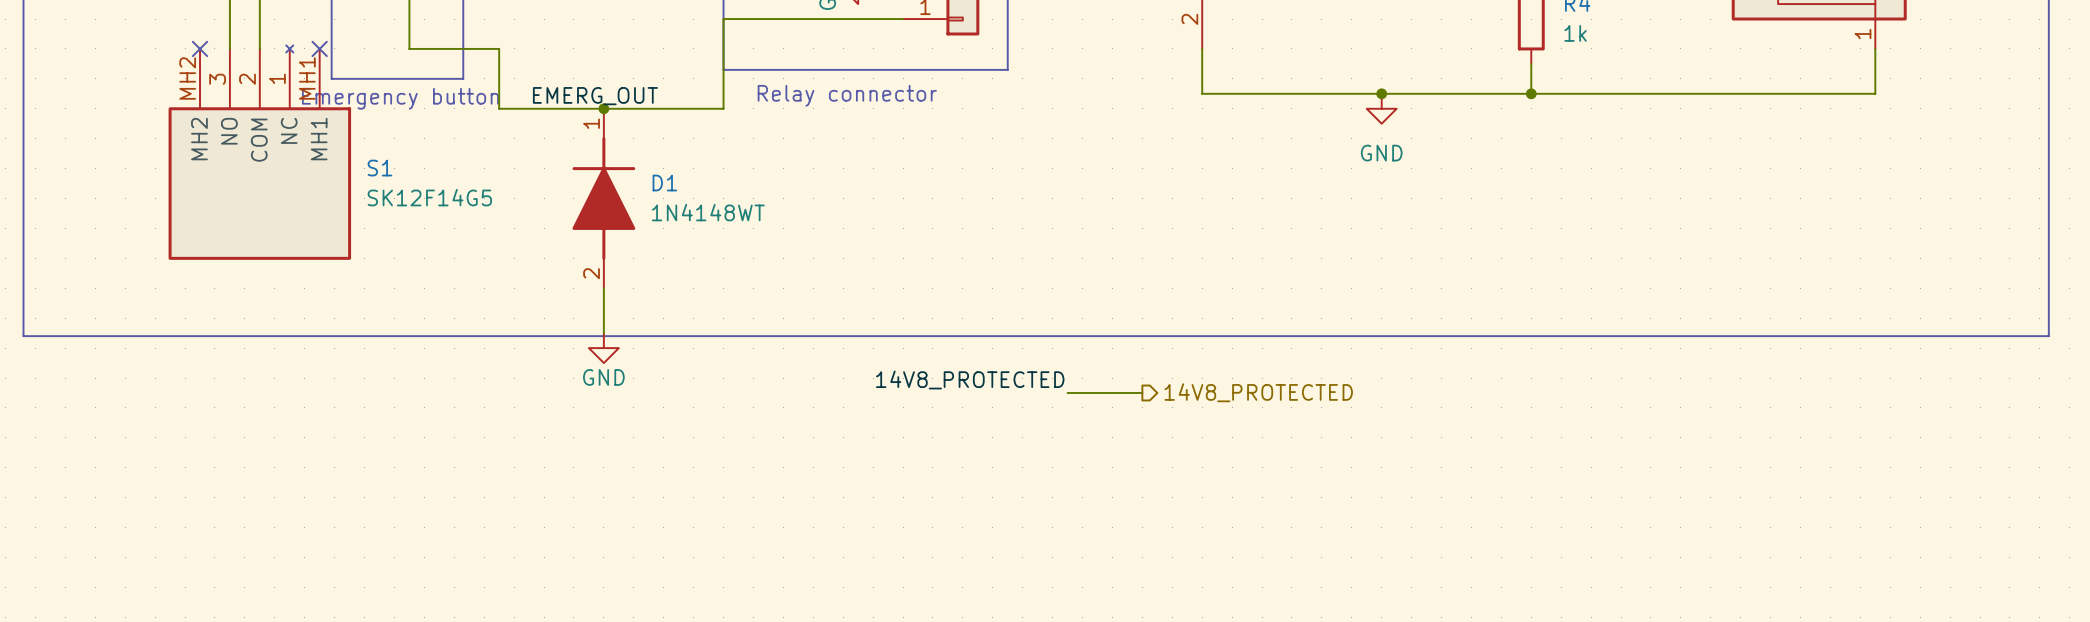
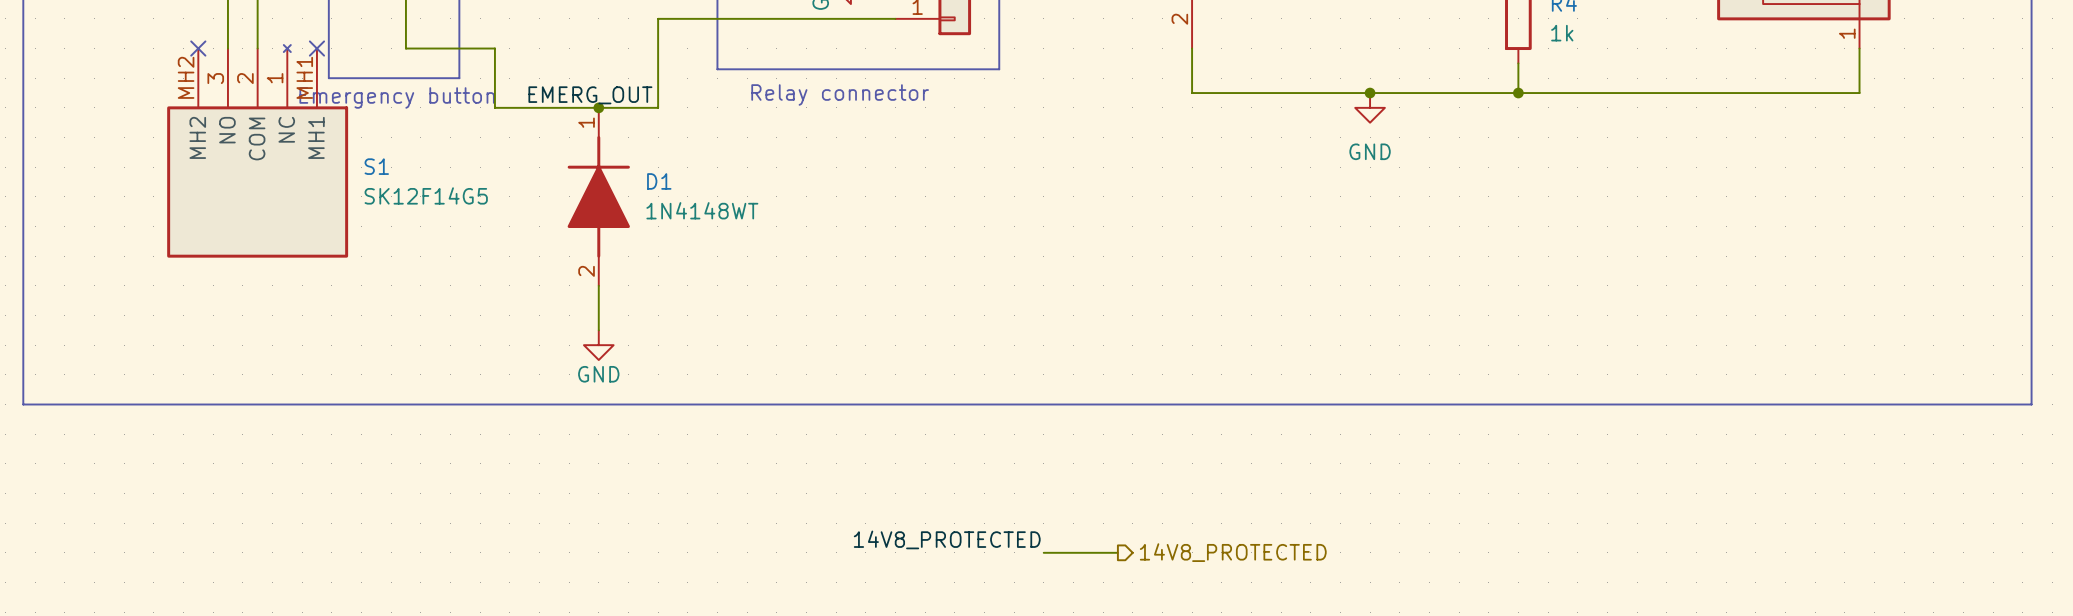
wire: (723, 19) (723, 108) (663, 108) -> (717, 18) (658, 18) (658, 107)
line: (23, 336) (2048, 336) -> (23, 333) (23, 404) (2031, 404) (2031, 333)
label position: 14V8_PROTECTED (970, 379) -> 14V8_PROTECTED (947, 539)
wire: (1067, 392) (1142, 392) -> (1043, 552) (1117, 552)
hierarchical label position: 14V8_PROTECTED (1258, 392) -> 14V8_PROTECTED (1233, 552)

